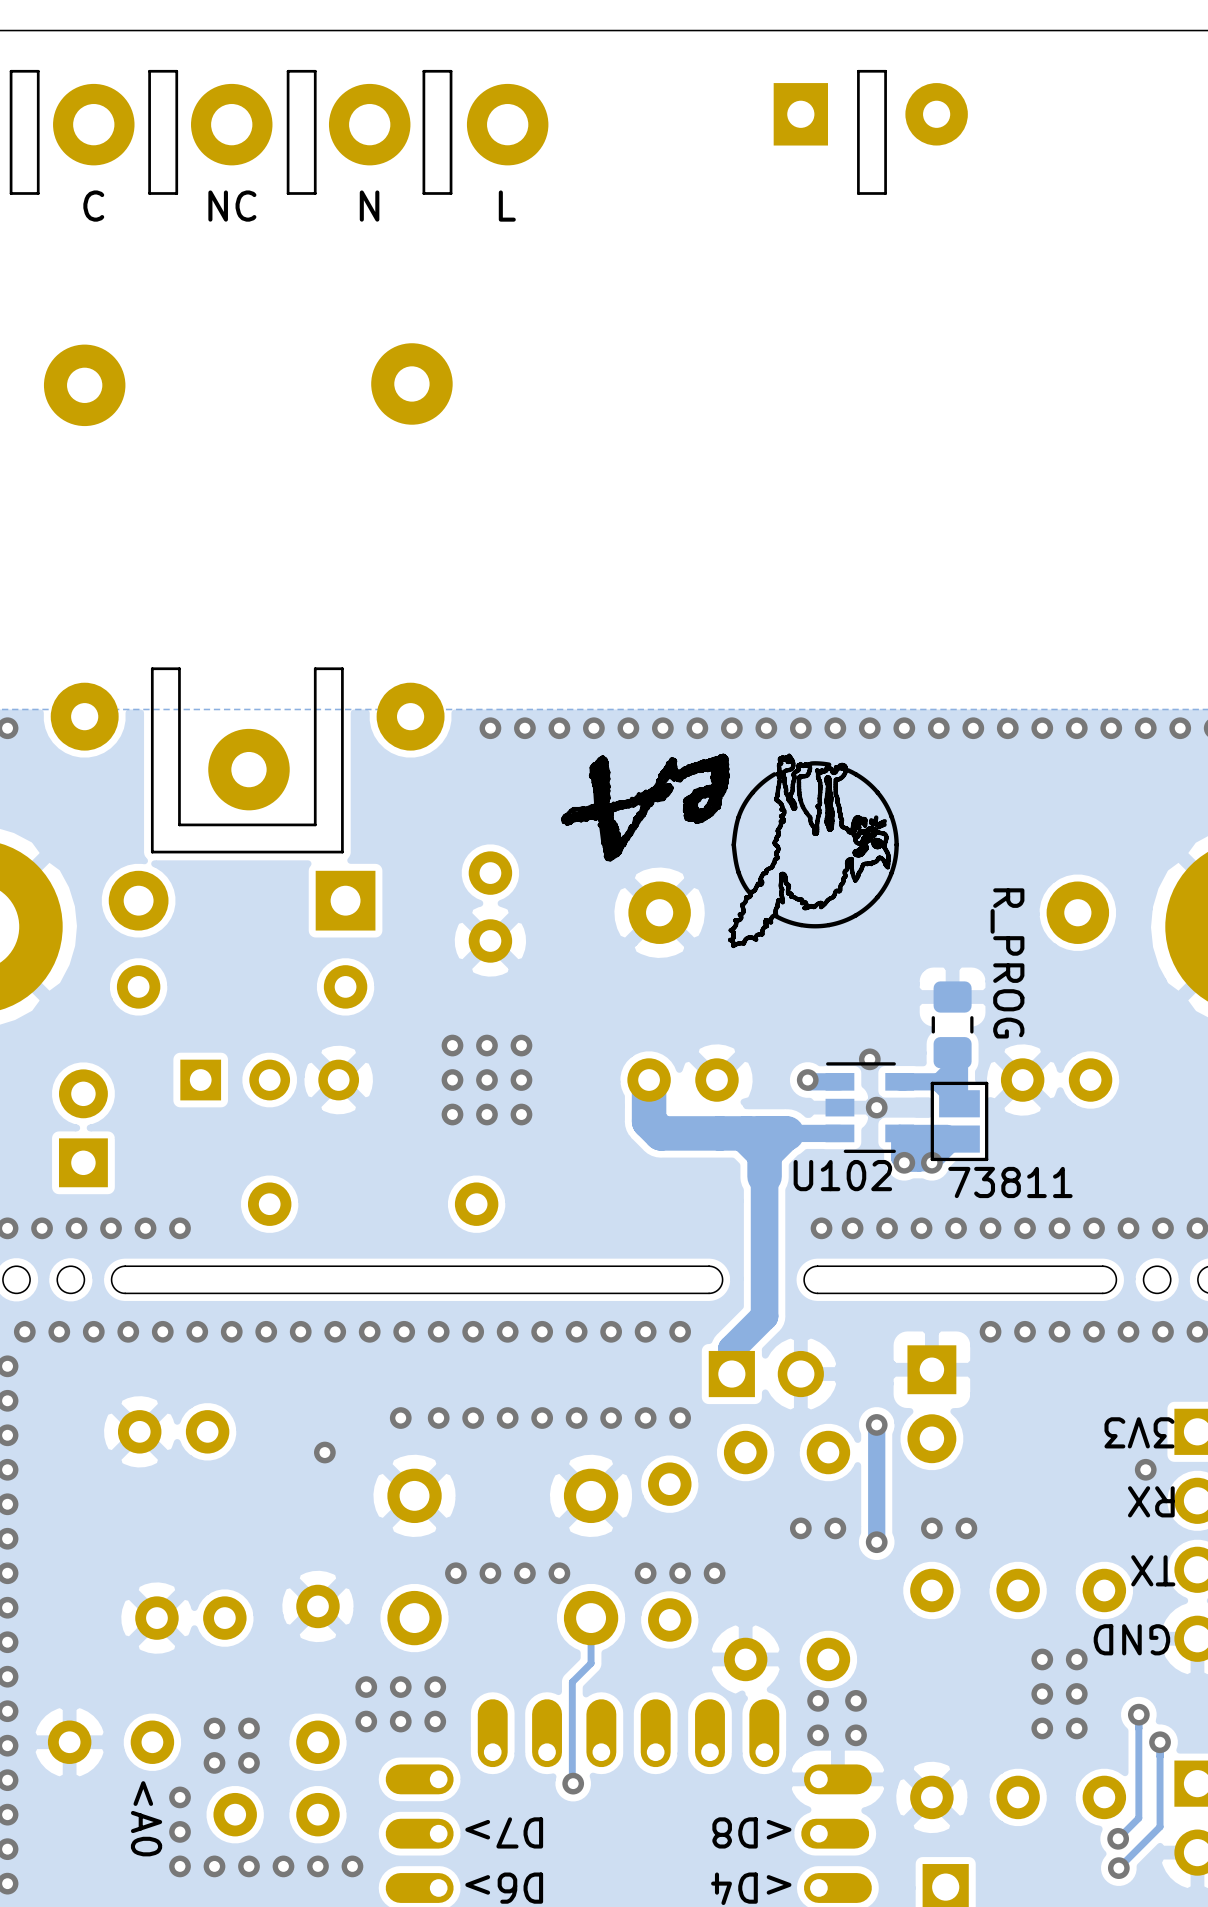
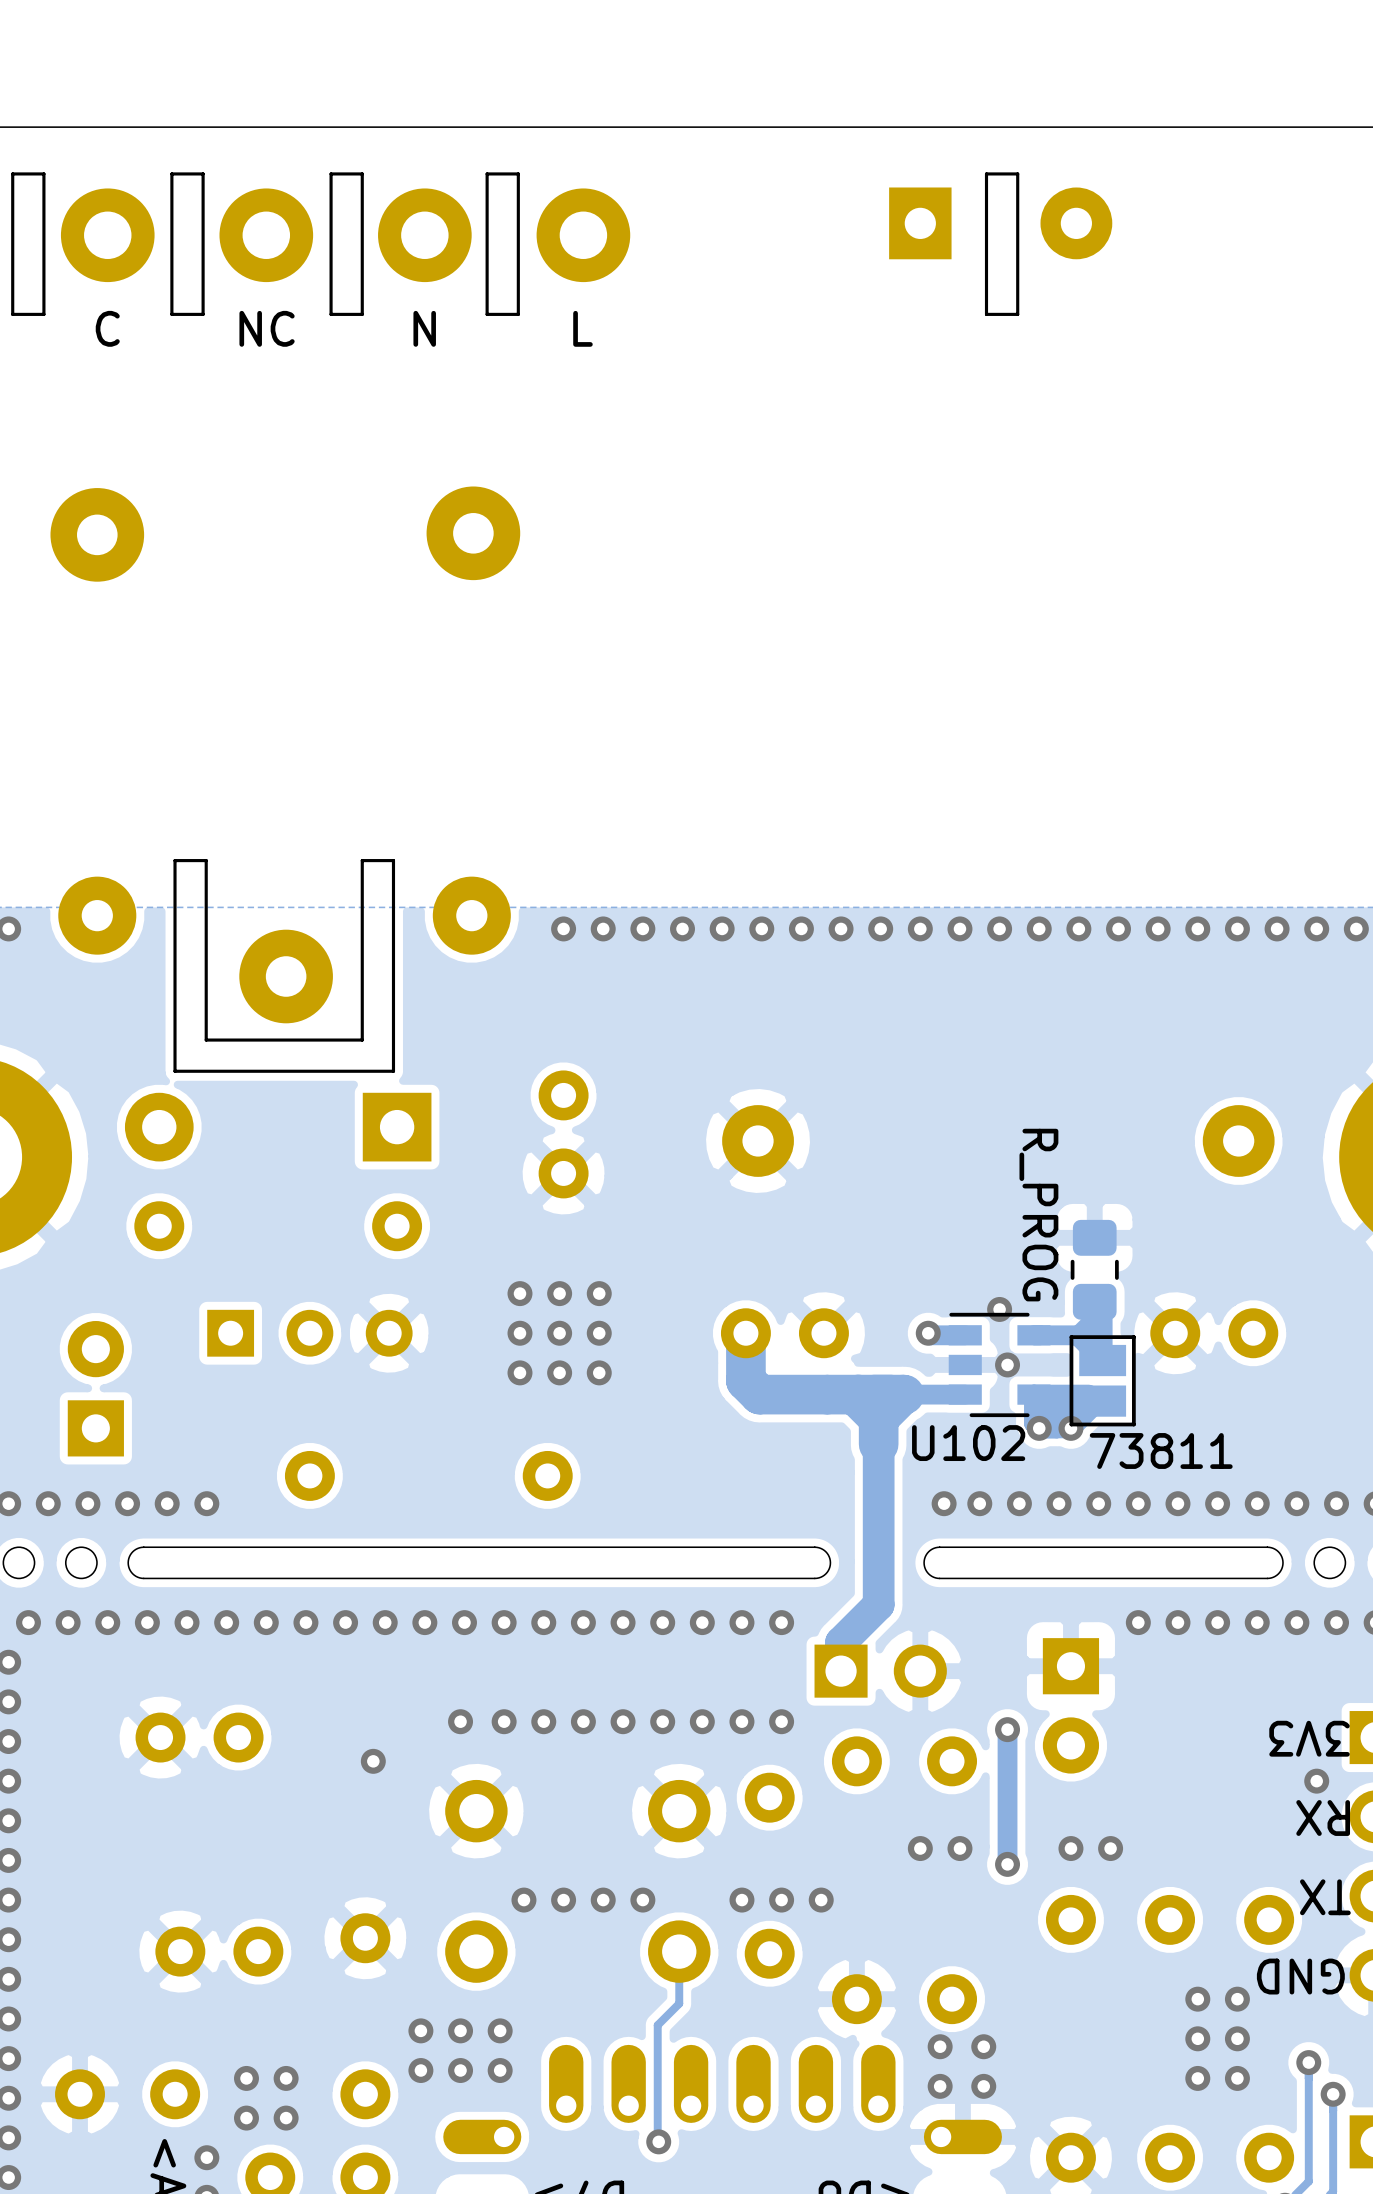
drawing: [560, 753, 899, 949] -> none
part value position: R_PROG (1007, 963) -> R_PROG (1038, 1215)

